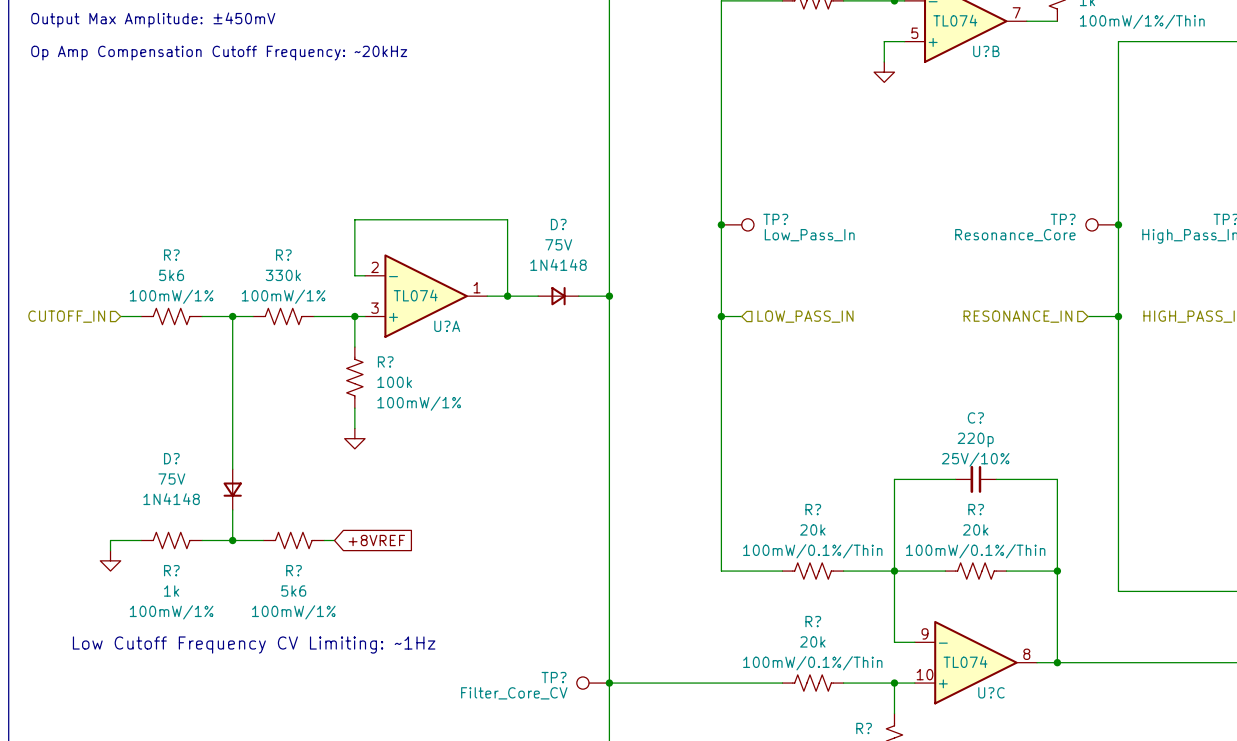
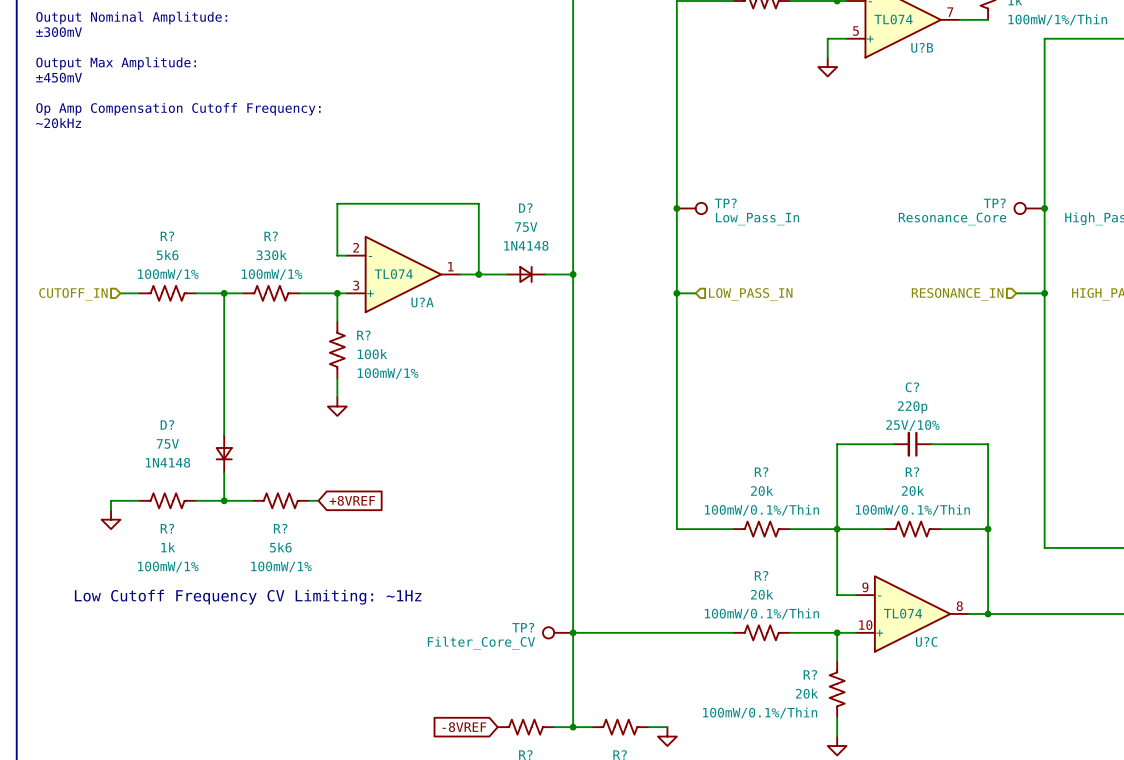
text: Output Max Amplitude: ±450mV (153, 20) -> Output Nominal Amplitude: (131, 18)
text: none -> ±300mV (59, 32)
text: Op Amp Compensation Cutoff Frequency: ~20kHz (219, 53) -> none
text: none -> Output Max Amplitude: (116, 63)
text: none -> ±450mV (59, 77)
text: none -> Op Amp Compensation Cutoff Frequency: (178, 109)
text: none -> ~20kHz (58, 123)

